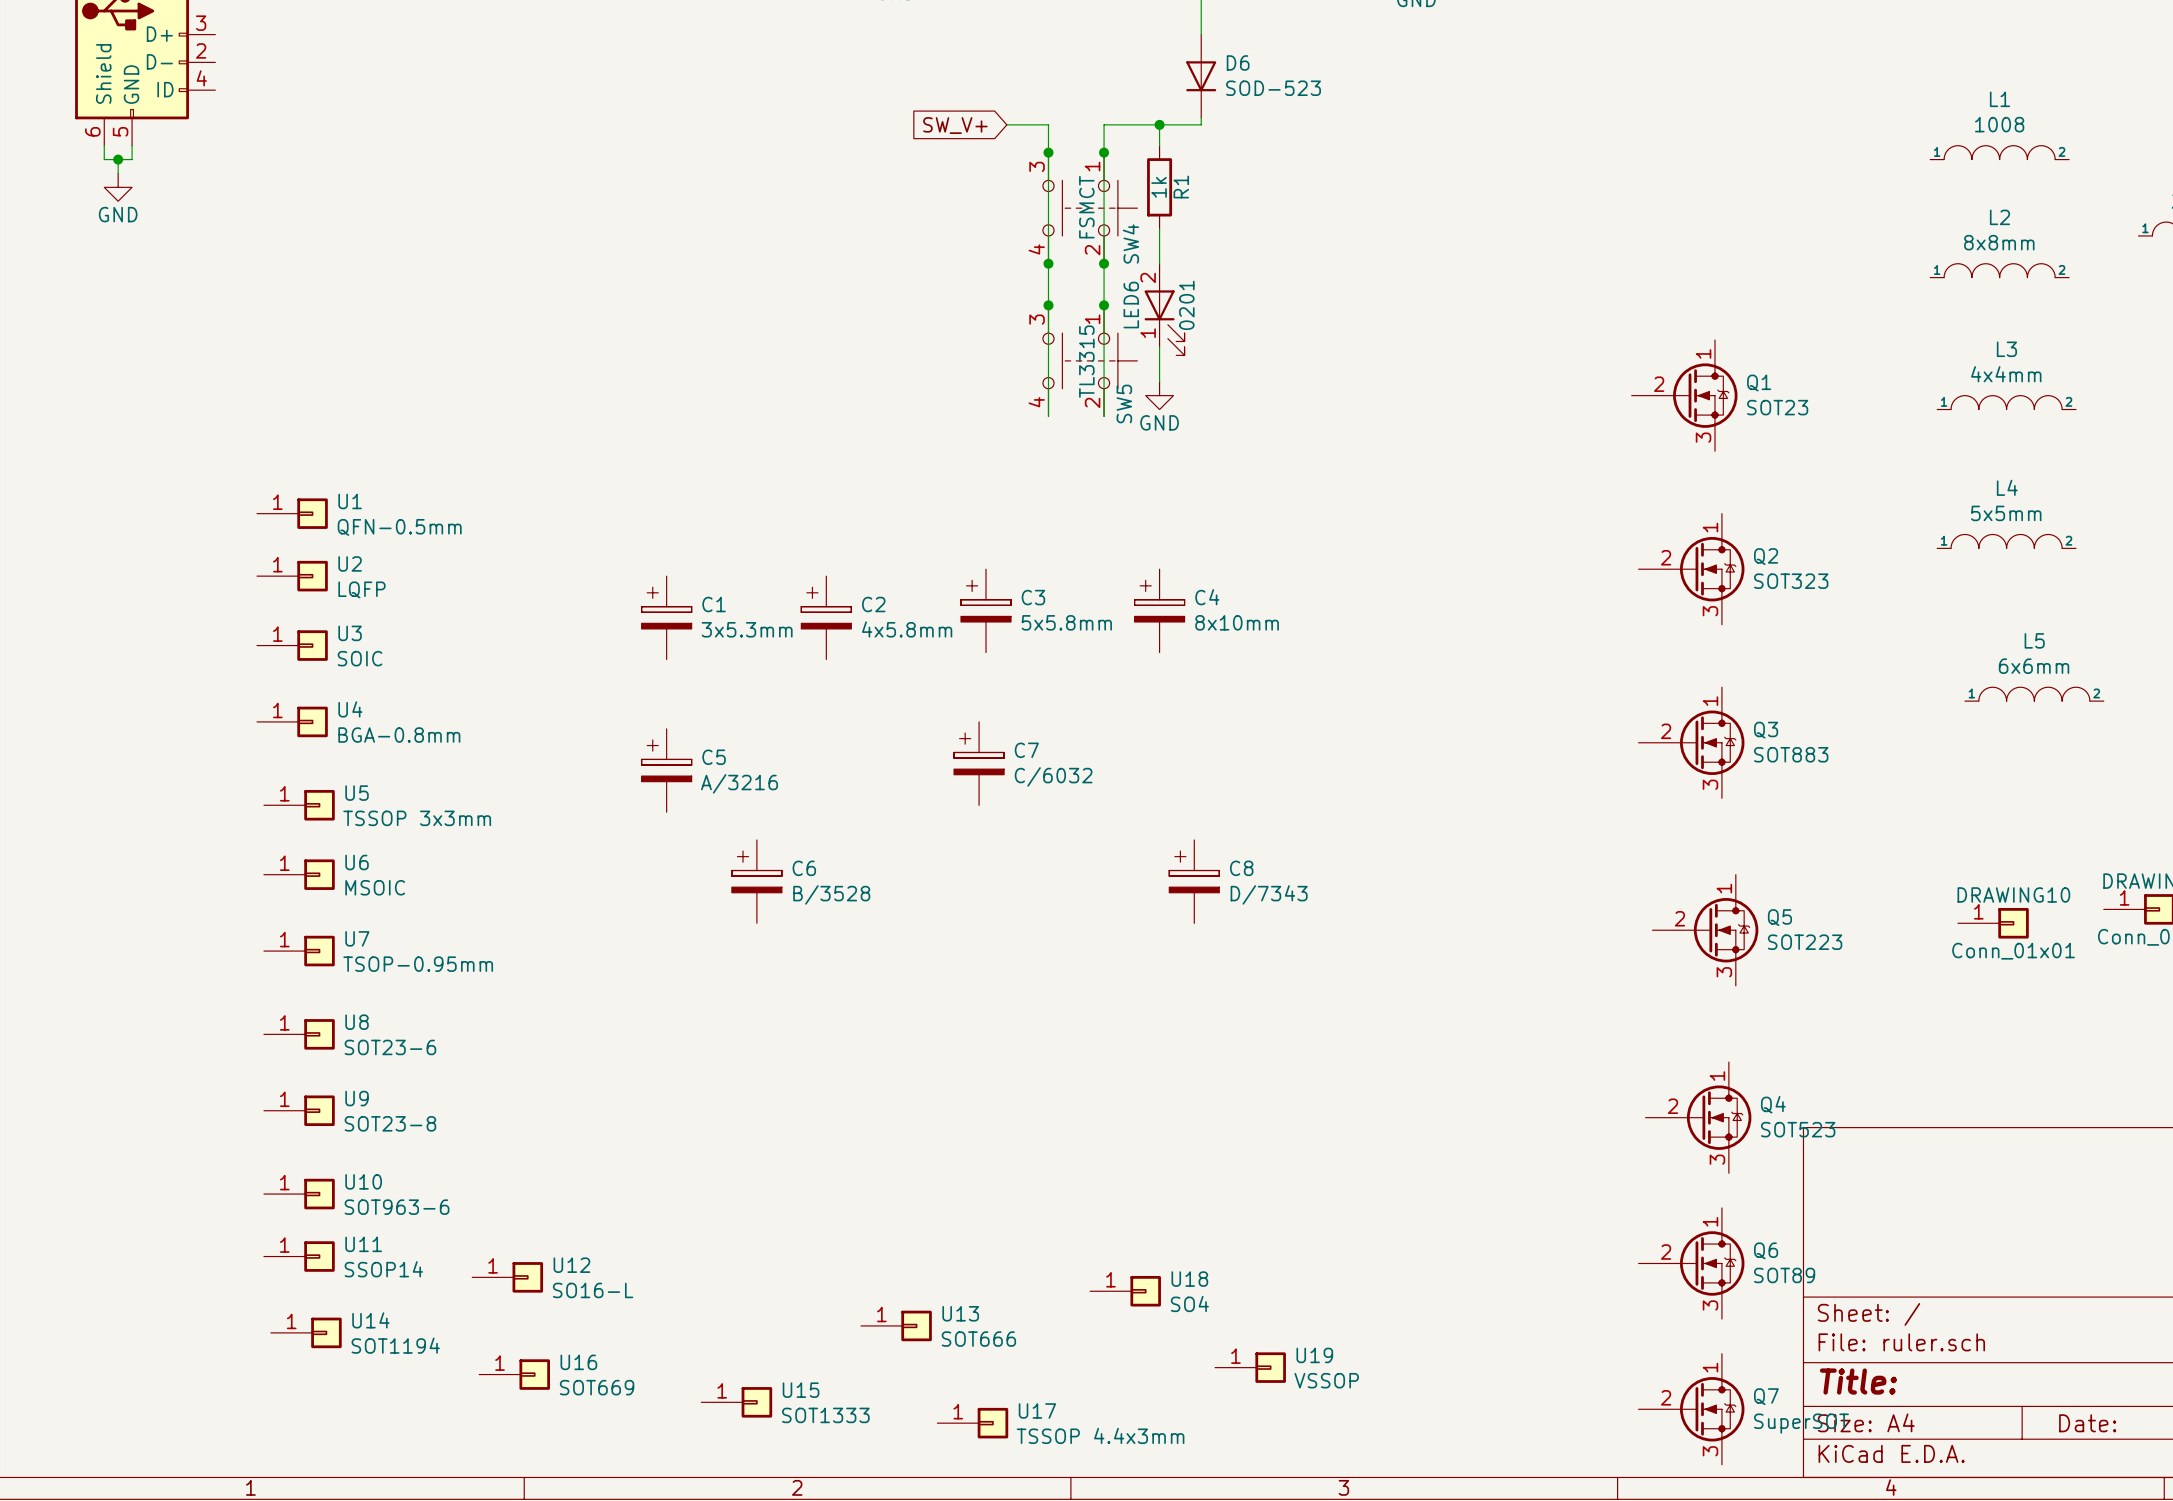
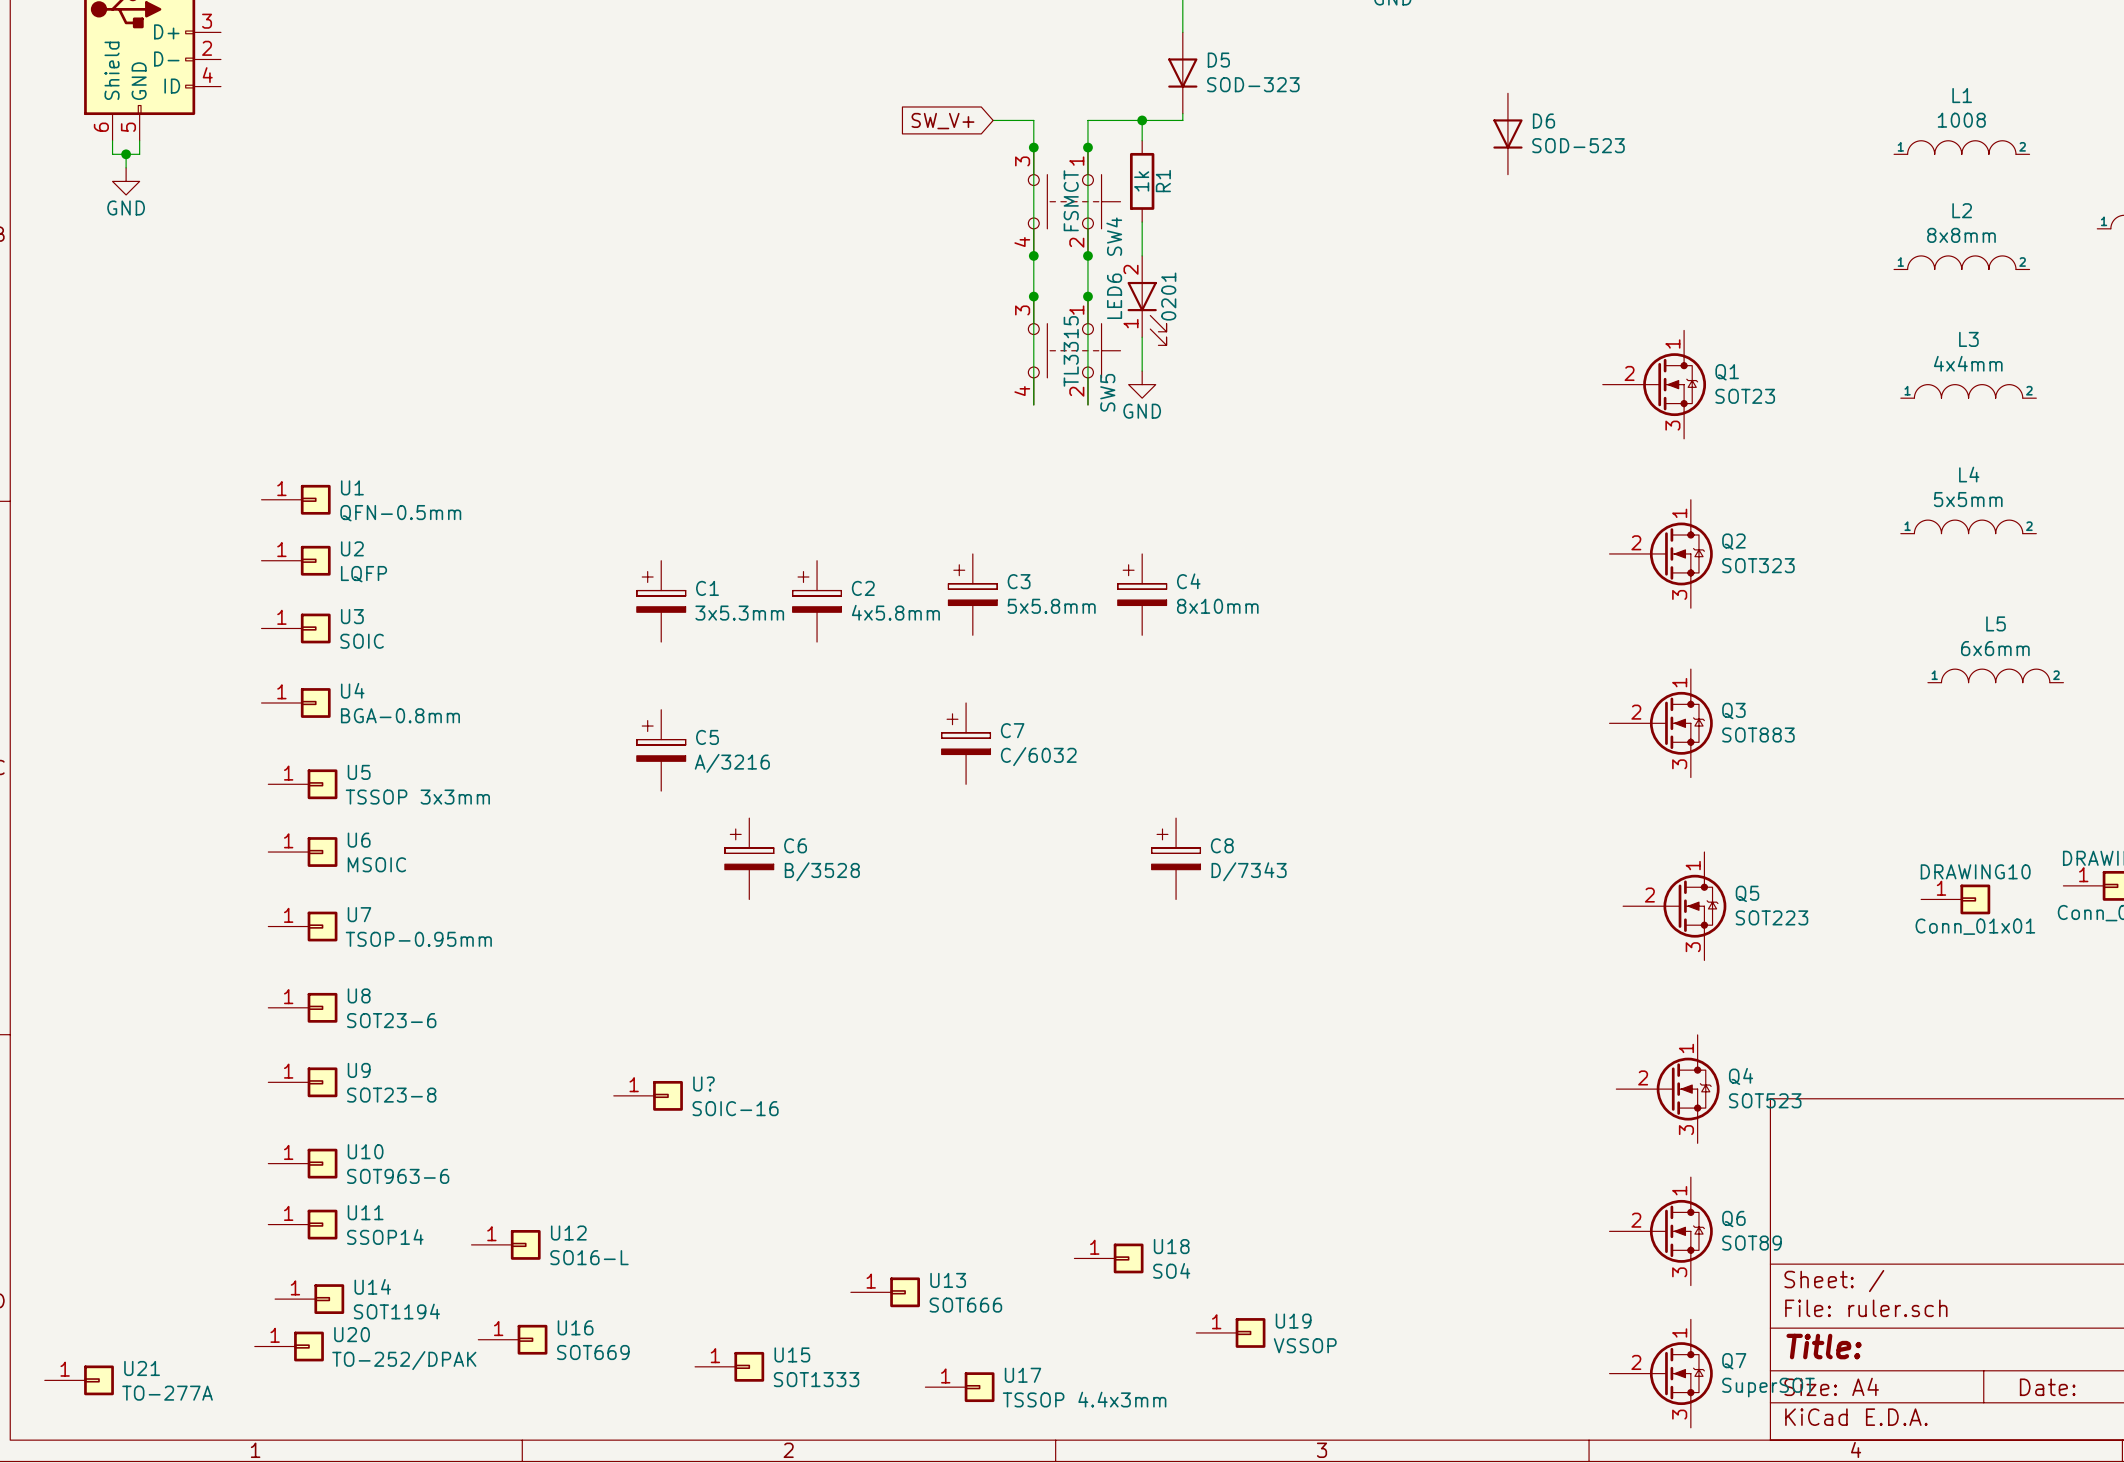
D6 name: D6 (1238, 62) -> D5 (1218, 60)
D6 value: SOD-523 (1273, 88) -> SOD-323 (1253, 84)
D6: none -> SOD-523 (1507, 133)
U?: none -> SOIC-16 (648, 1095)
U20: none -> TO-252/DPAK (289, 1346)
U21: none -> TO-277A (79, 1380)

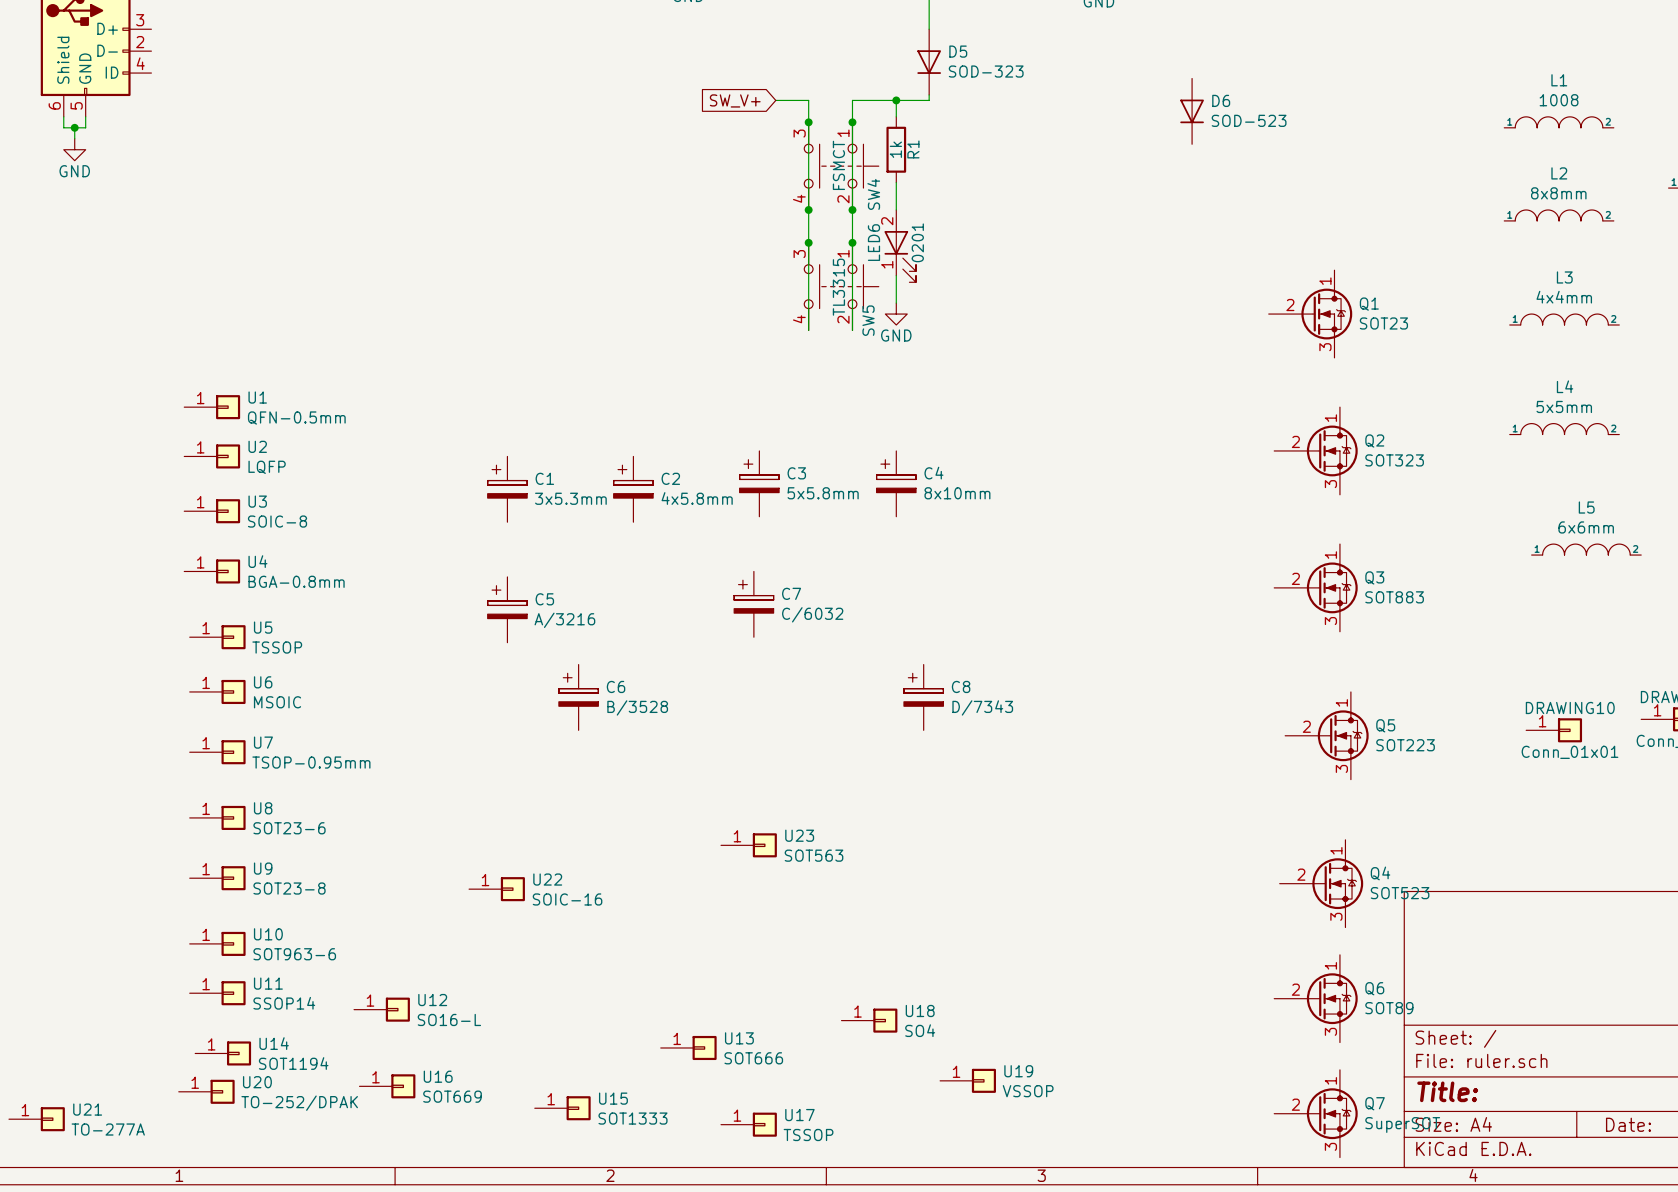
U3 value: SOIC (362, 641) -> SOIC-8 (277, 521)
U5 value: TSSOP 3x3mm (417, 797) -> TSSOP (277, 647)
U23: none -> SOT563 (748, 845)
U? name: U? (703, 1083) -> U22 (547, 879)
U17 value: TSSOP 4.4x3mm (1084, 1399) -> TSSOP (808, 1134)

